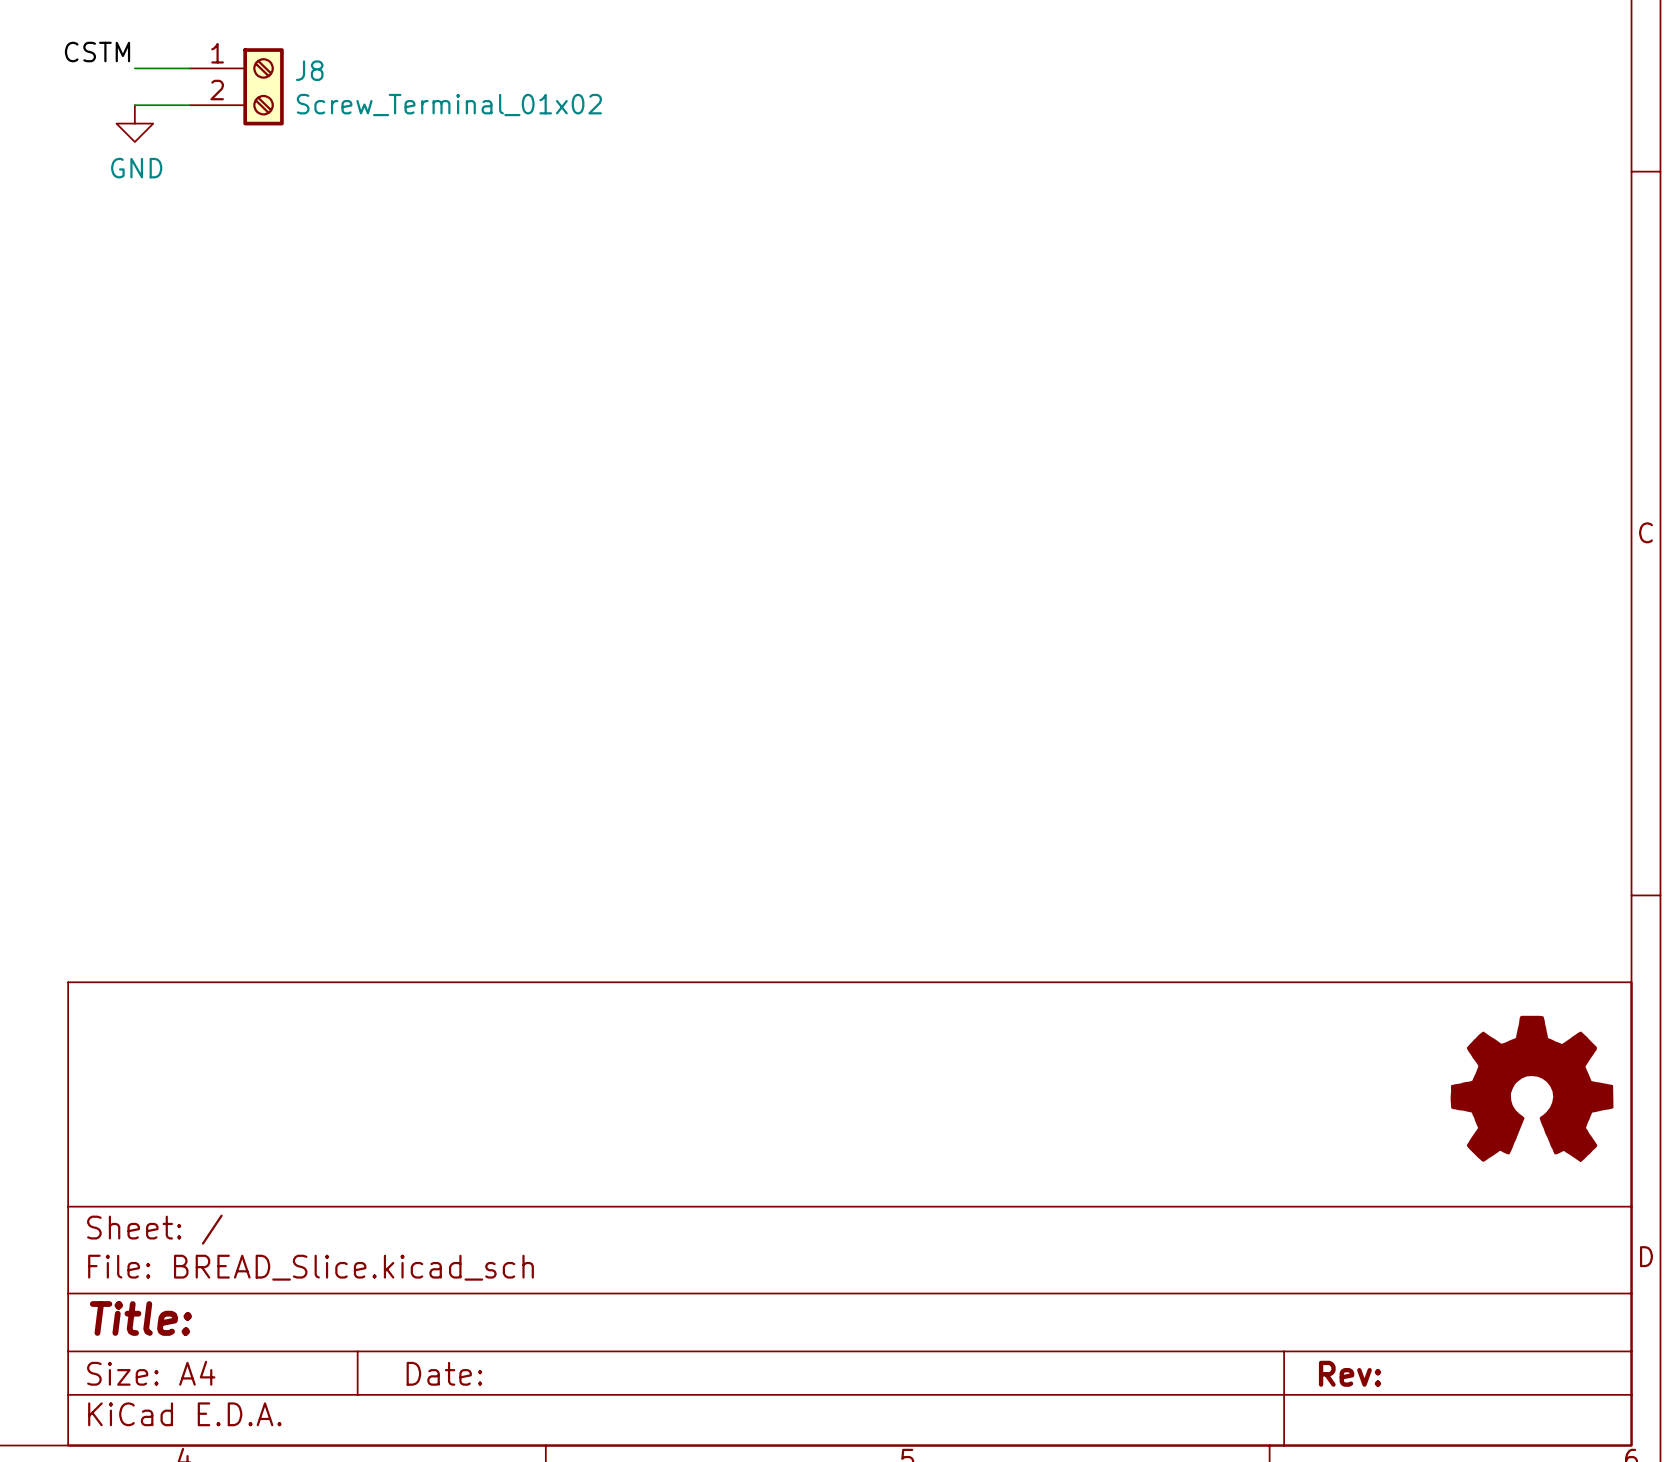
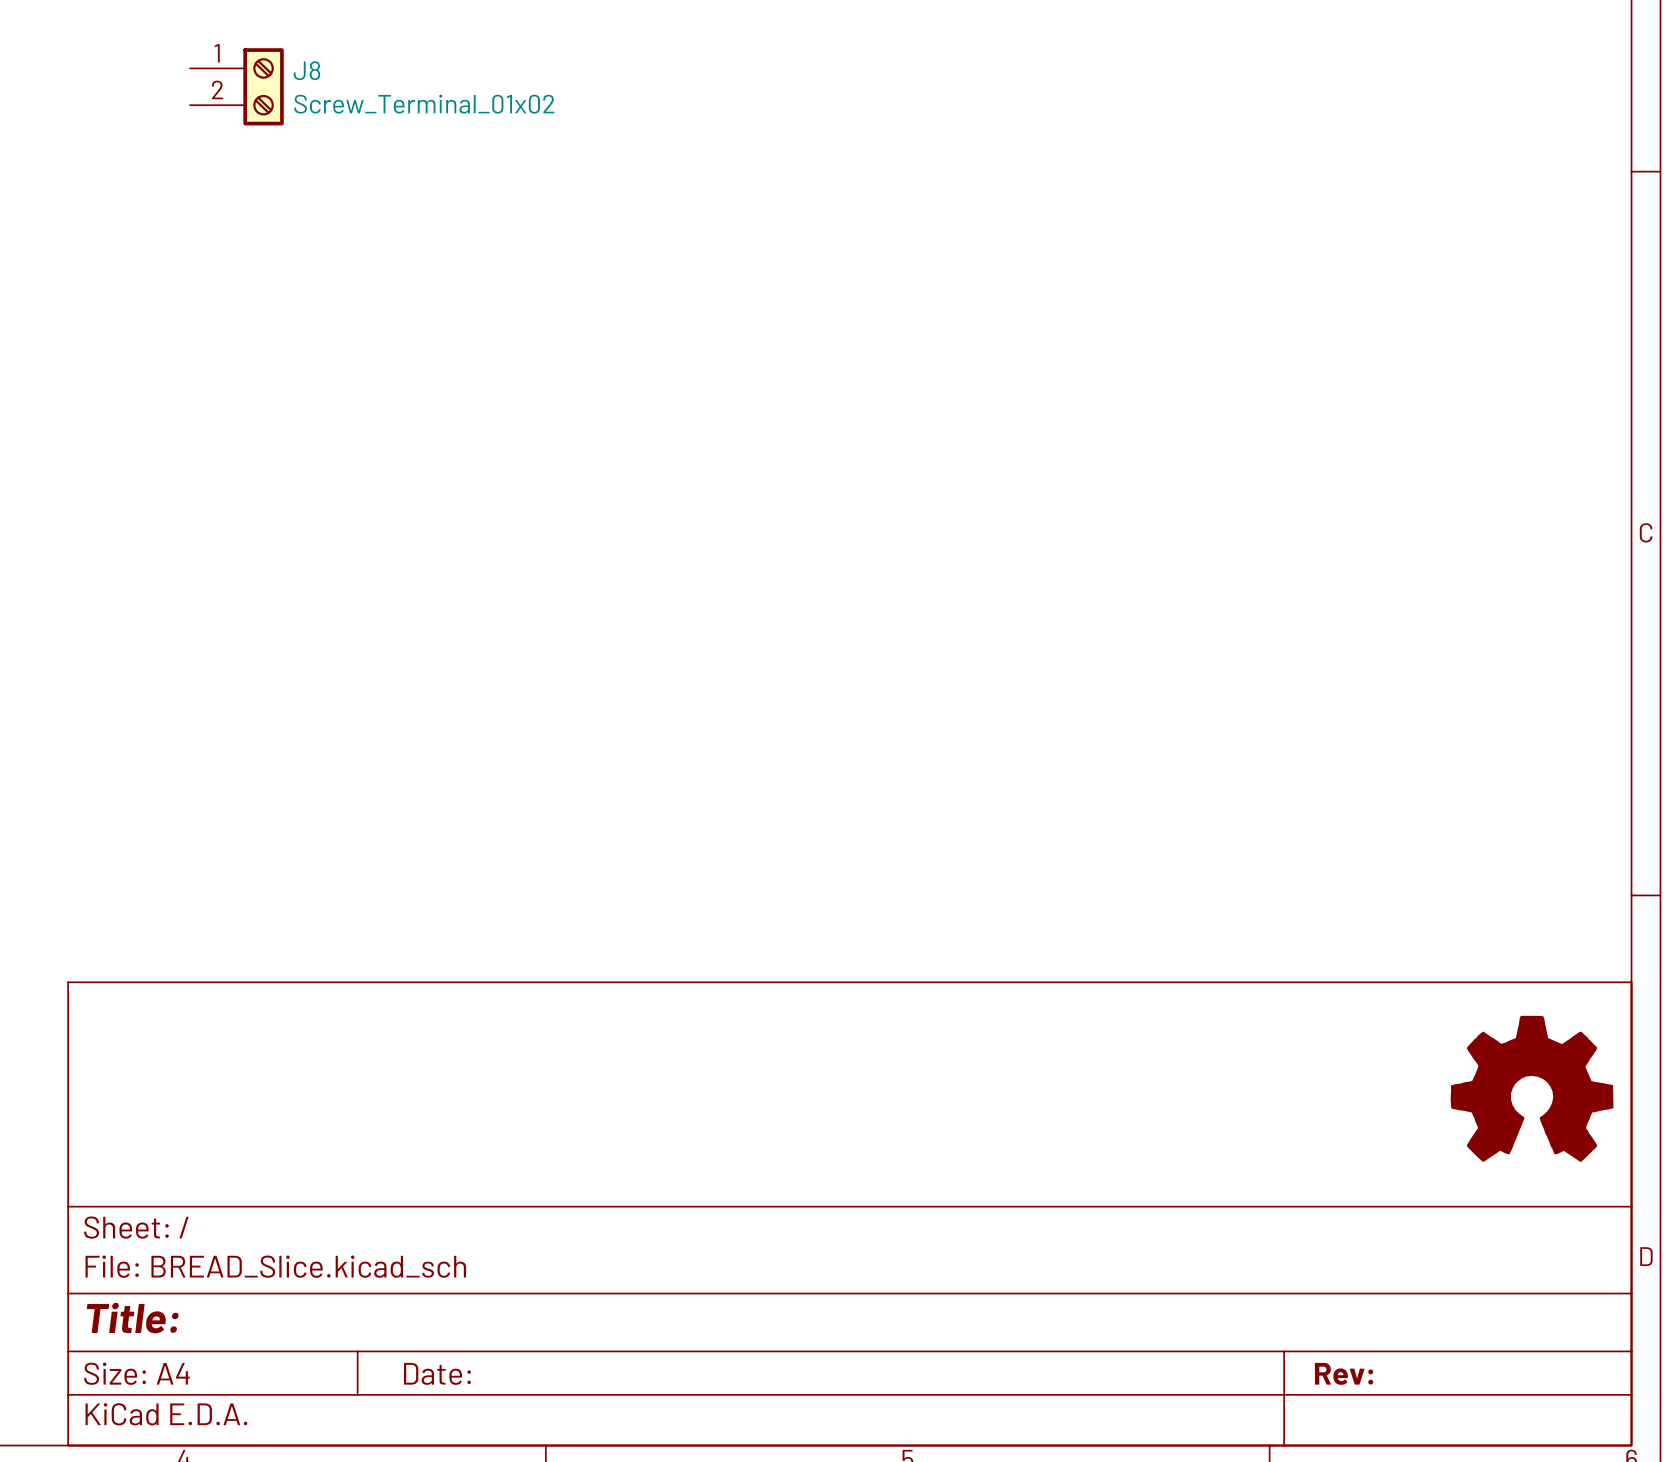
label: CSTM (97, 52) -> none
wire: (134, 68) (190, 68) -> none
wire: (134, 105) (190, 105) -> none
power symbol: GND (134, 123) -> none

